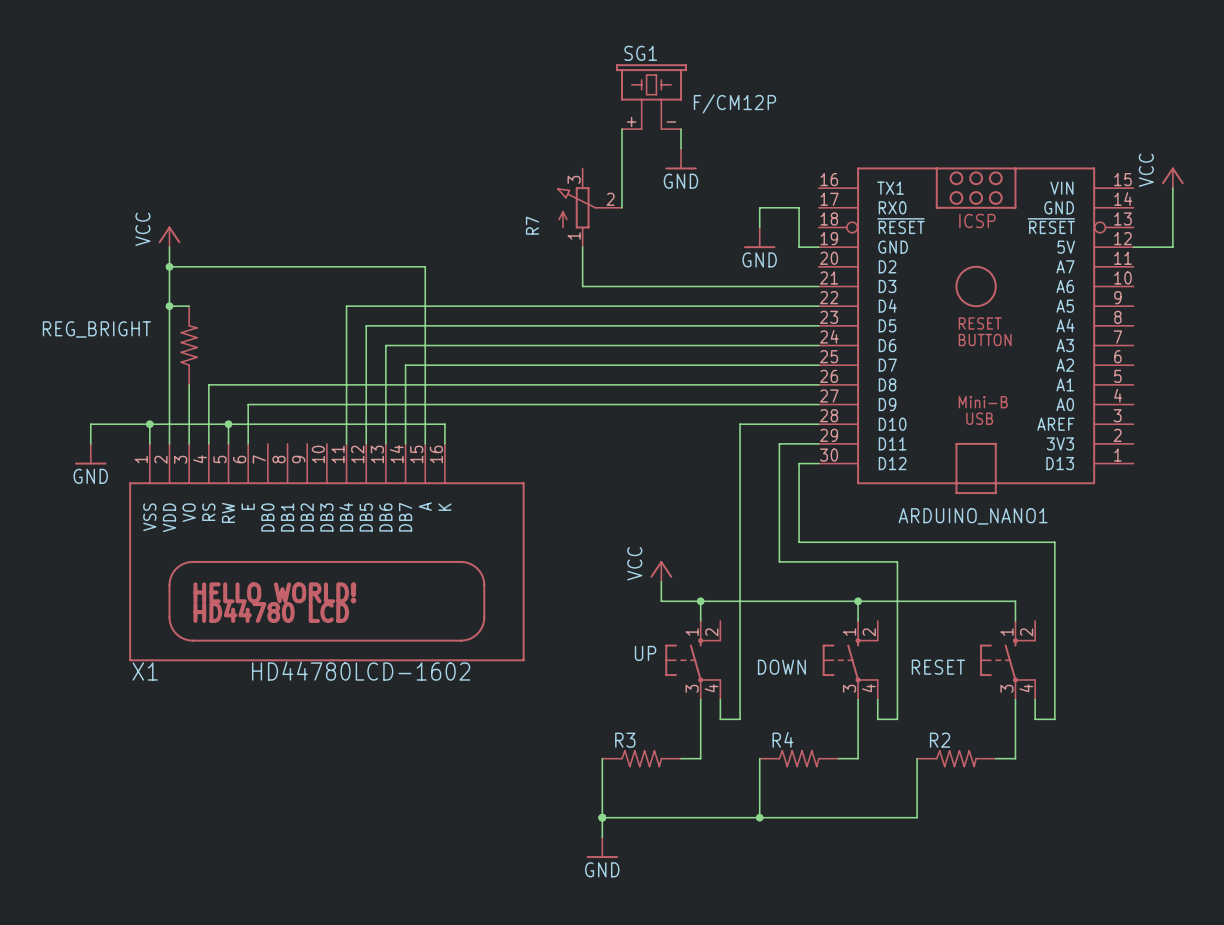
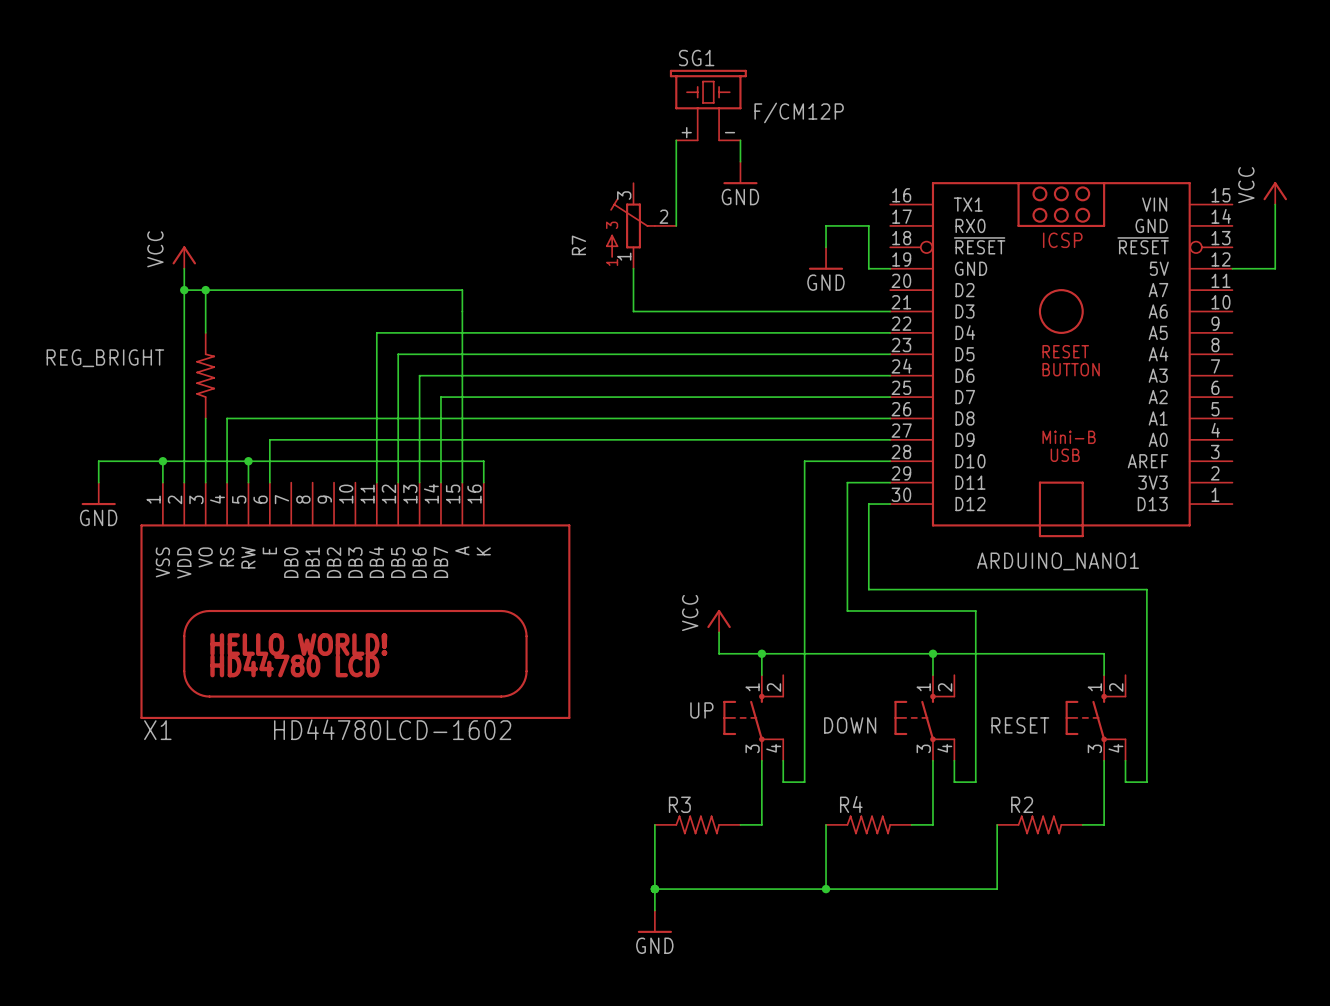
R7 symbol: [557, 168, 622, 248] -> [606, 183, 677, 269]
wire: (169, 306) (189, 306) -> (205, 290) (205, 332)
junction position: (169, 306) -> (205, 290)

